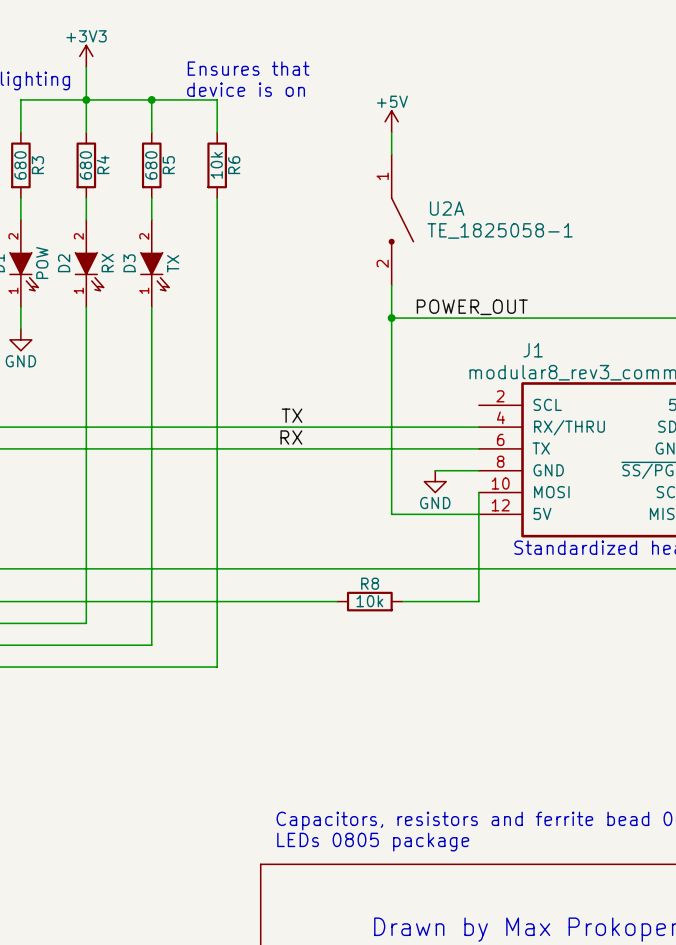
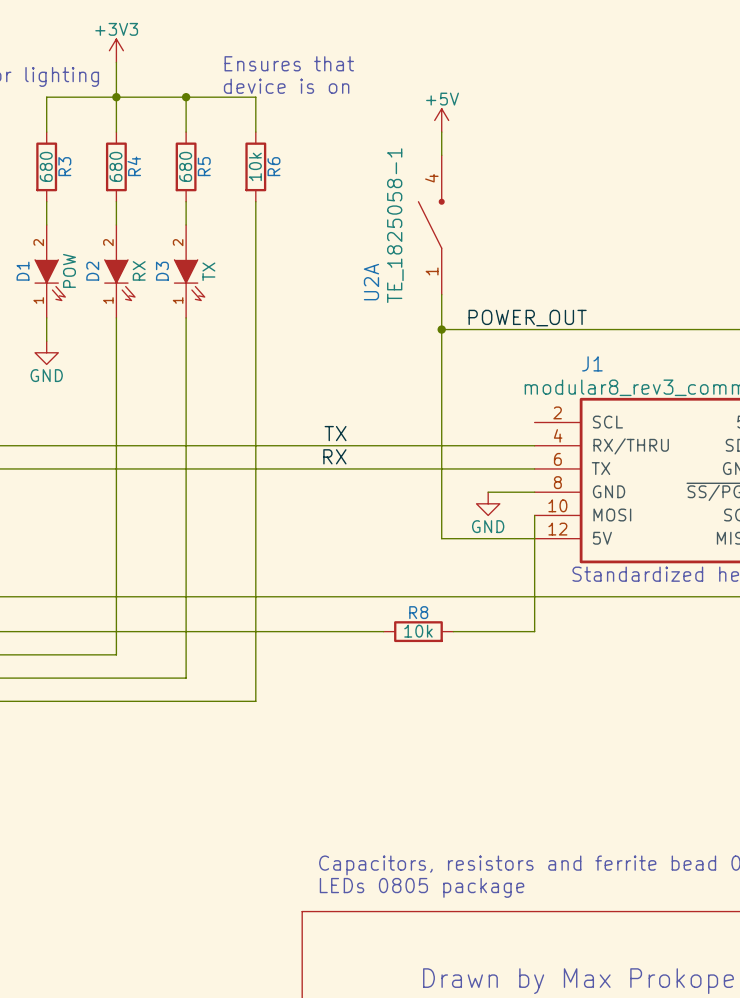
U2A symbol: [389, 154, 414, 286] -> [418, 155, 445, 295]
U2A name position: U2A (447, 208) -> U2A (371, 282)
U2A value position: TE_1825058-1 (500, 230) -> TE_1825058-1 (395, 225)

